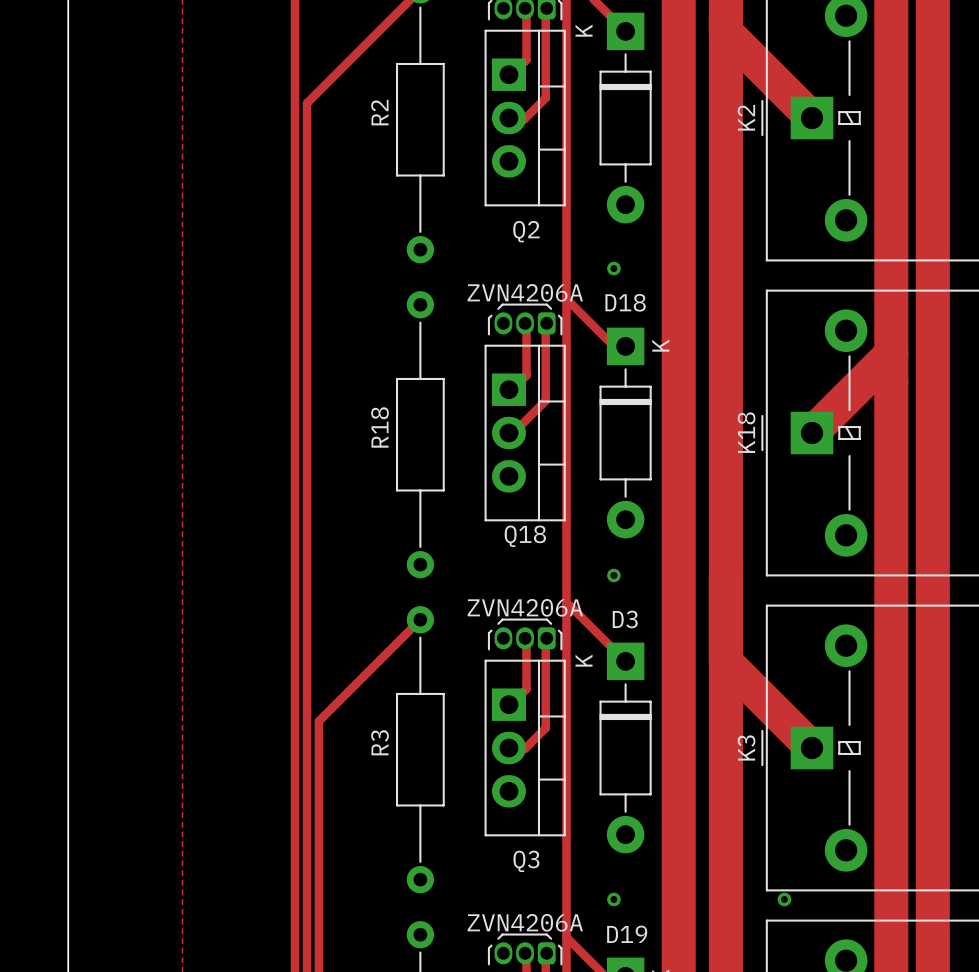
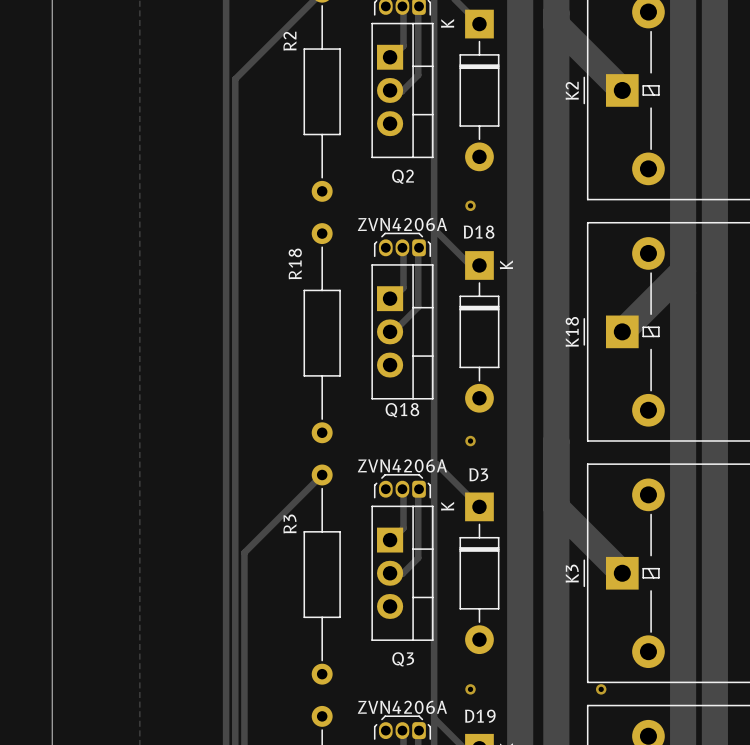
R2 name position: R2 (379, 112) -> R2 (289, 41)
R18 name position: R18 (380, 427) -> R18 (295, 263)
R3 name position: R3 (380, 742) -> R3 (289, 523)

